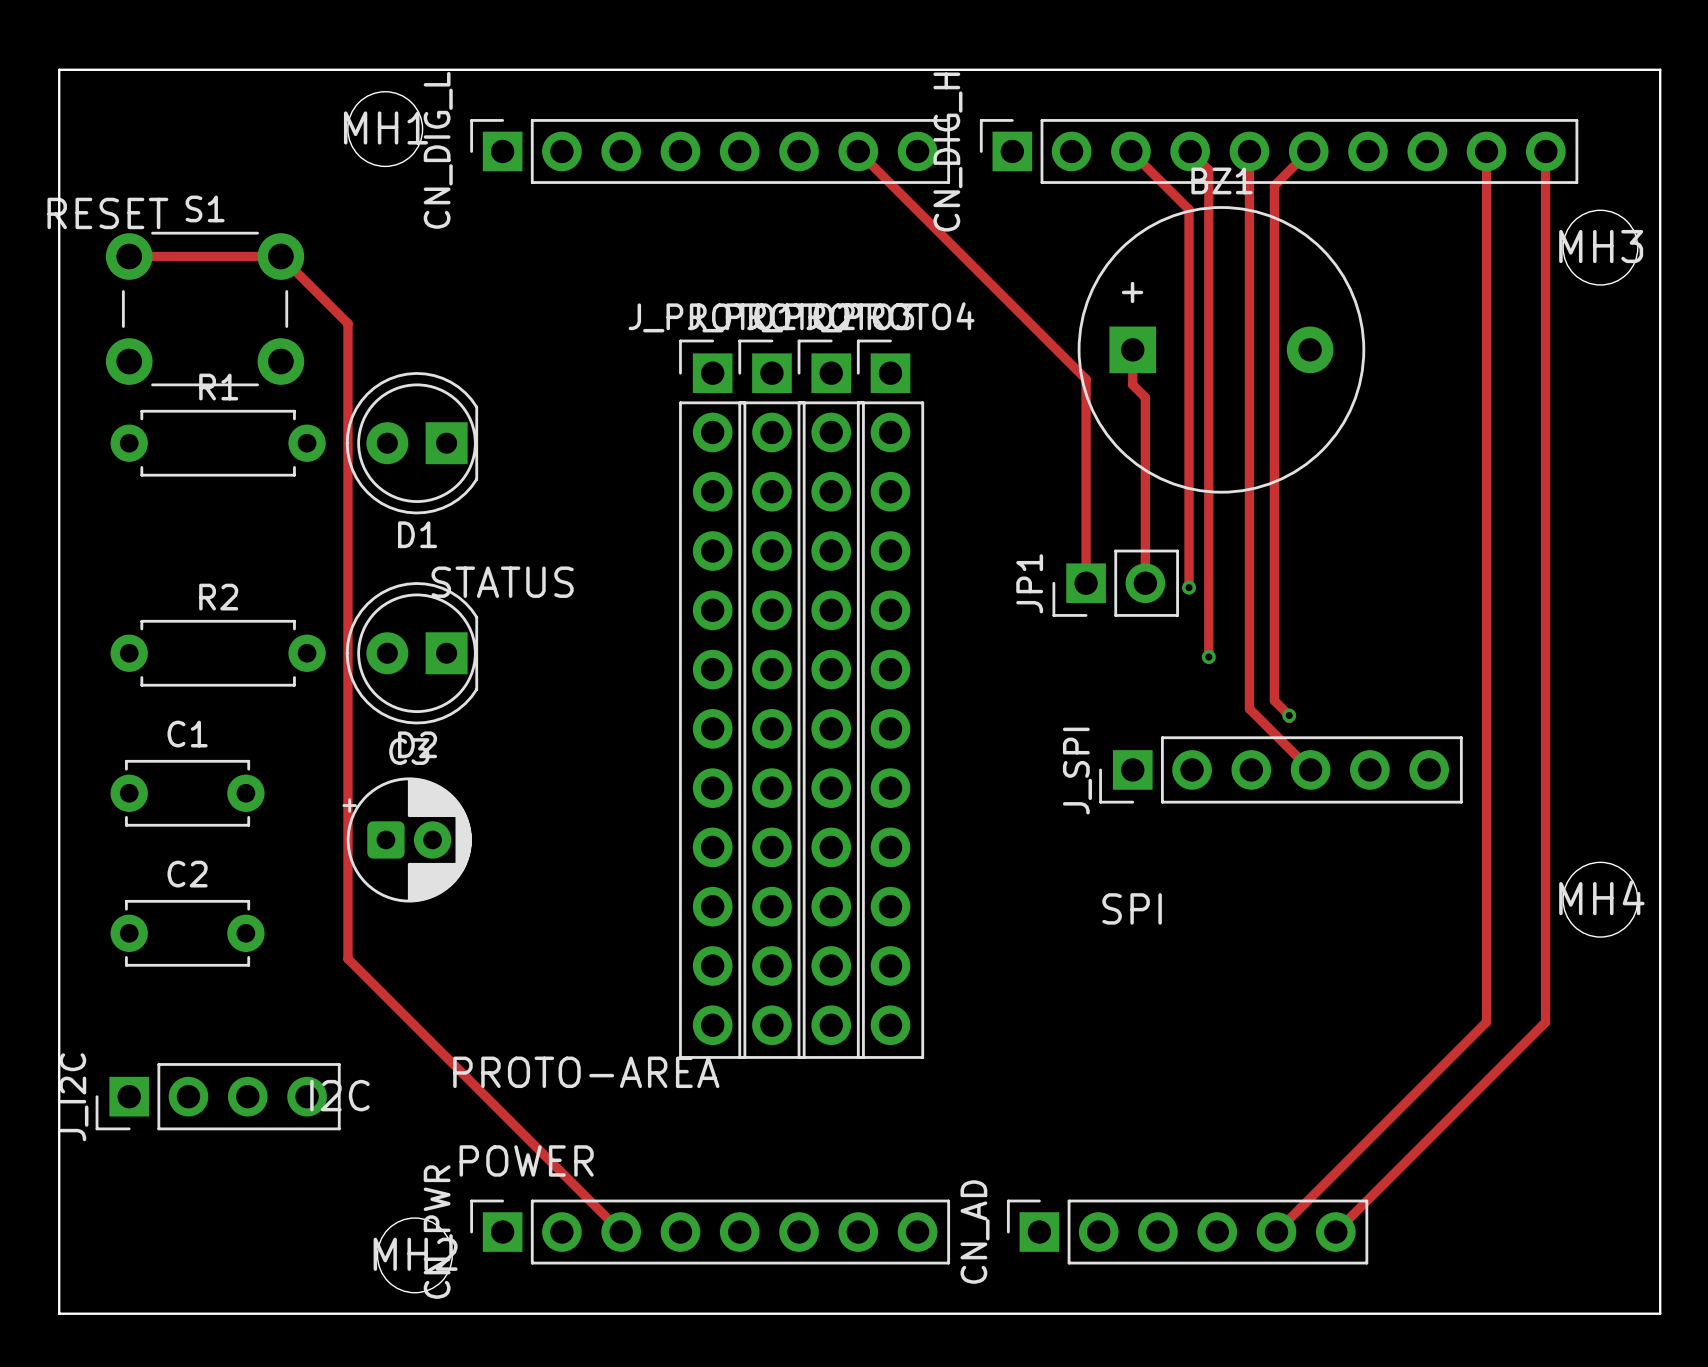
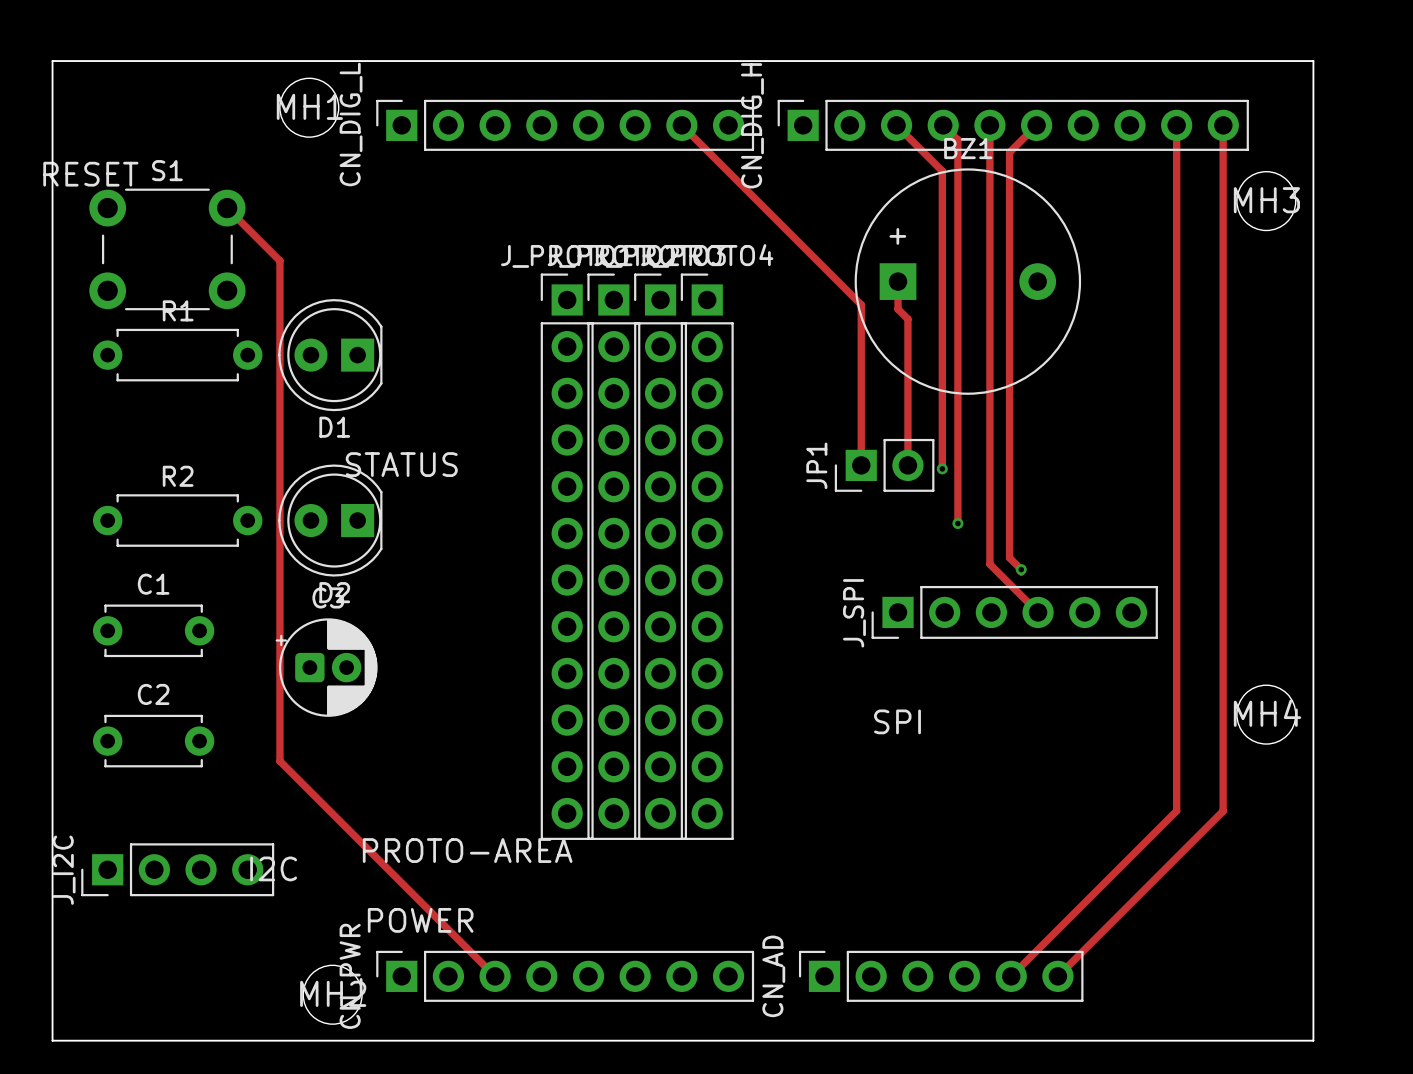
track: (129, 256) (280, 256) -> none

